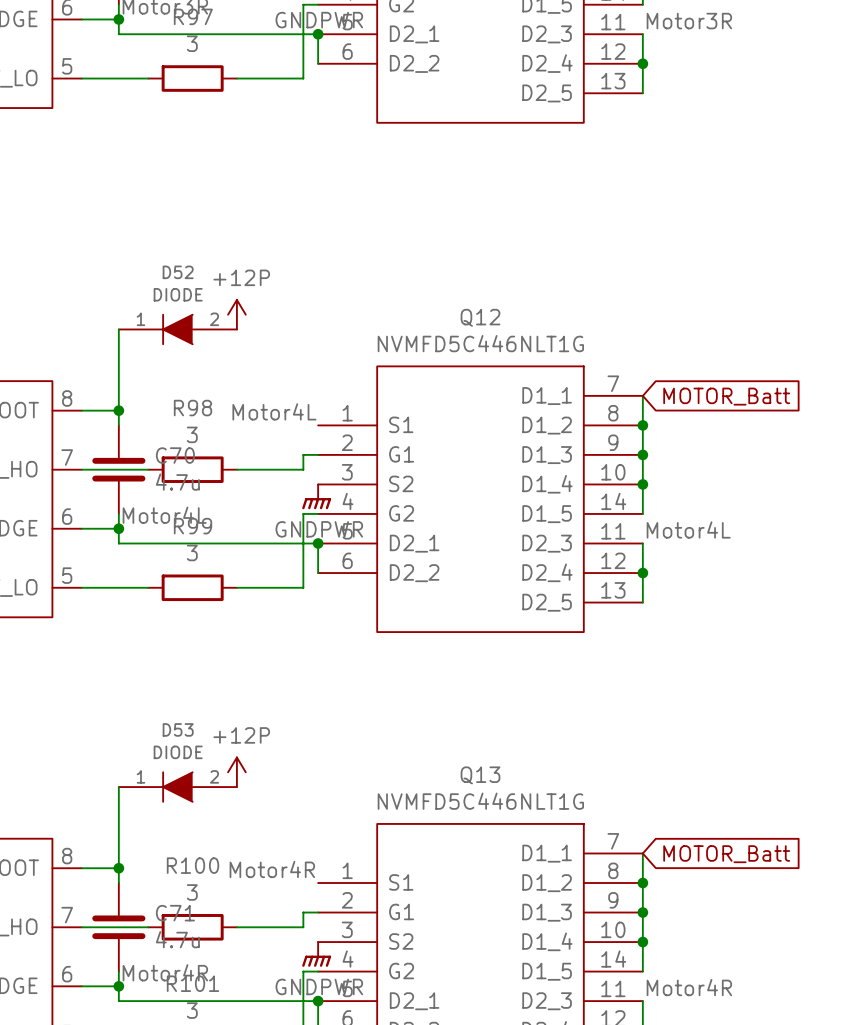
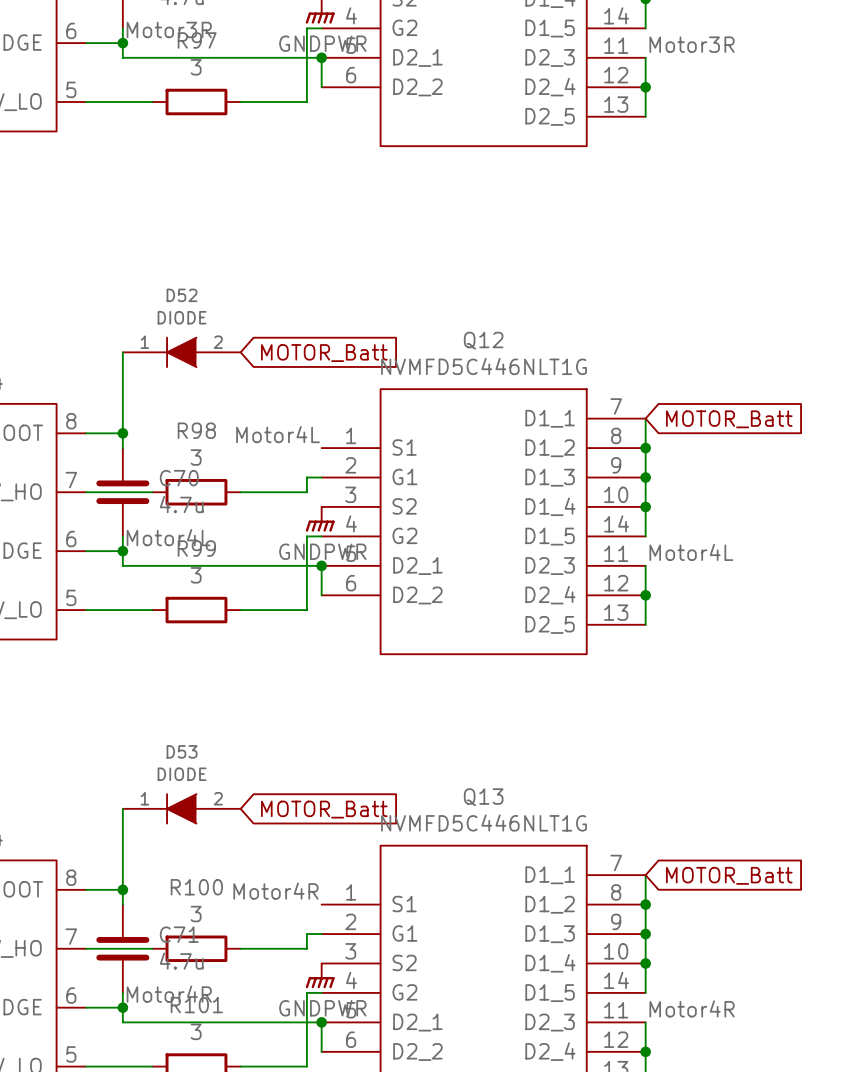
power symbol: +12P (236, 314) -> none
global label: none -> MOTOR_Batt (324, 353)
power symbol: +12P (236, 772) -> none
global label: none -> MOTOR_Batt (324, 809)

